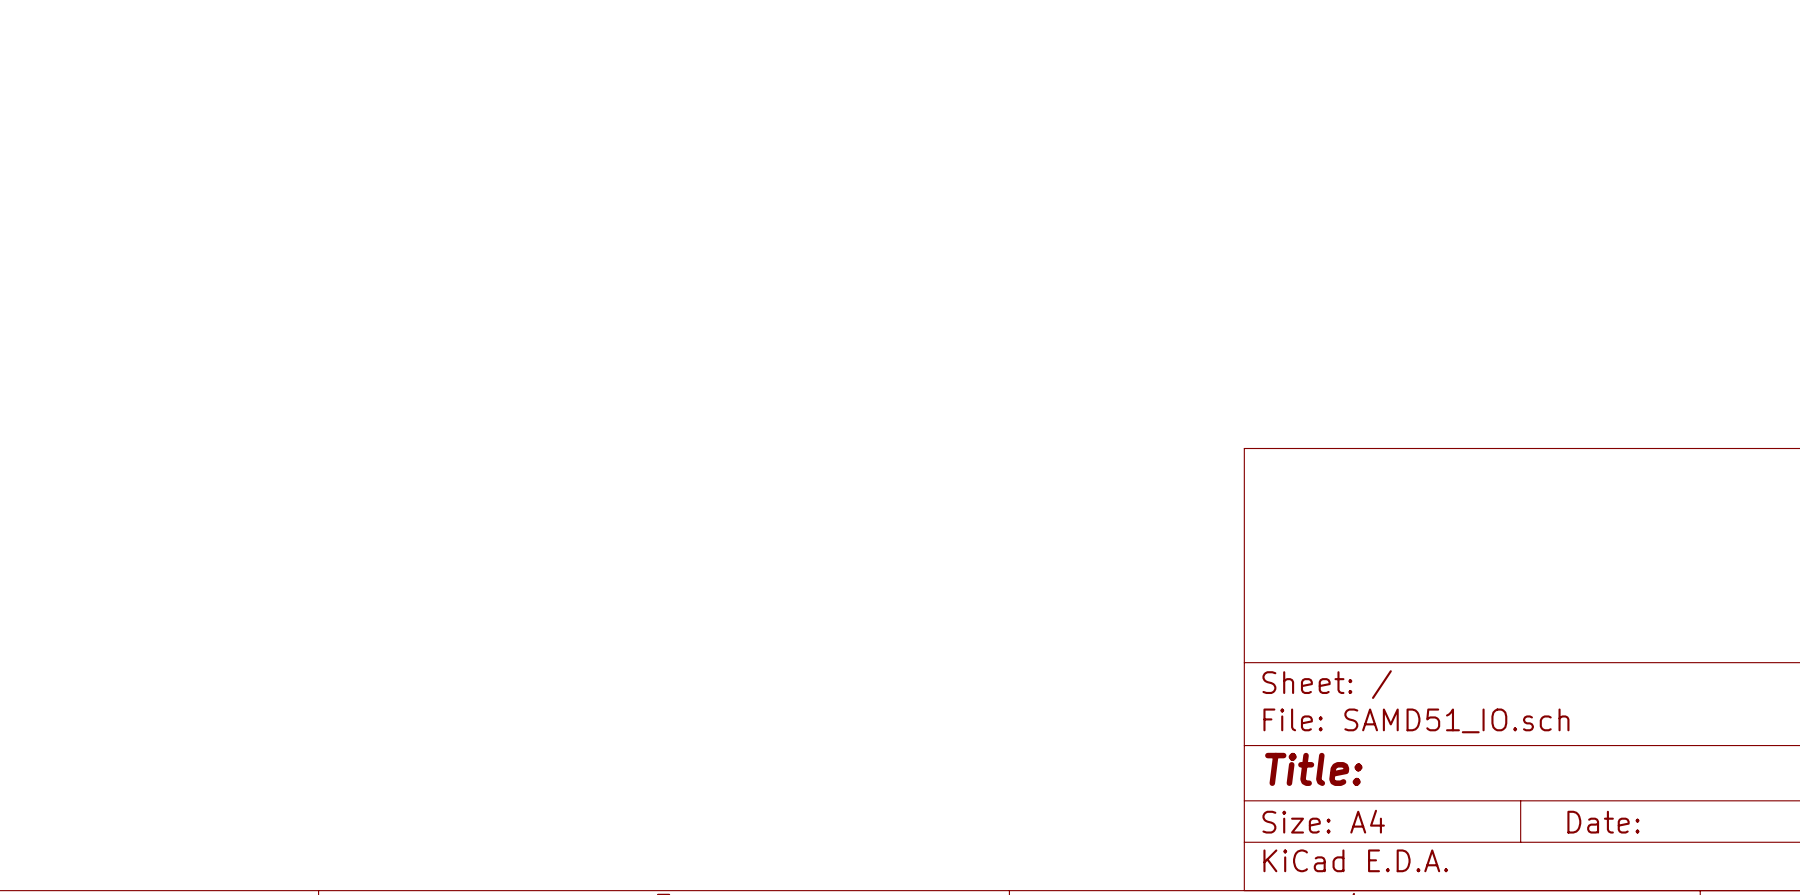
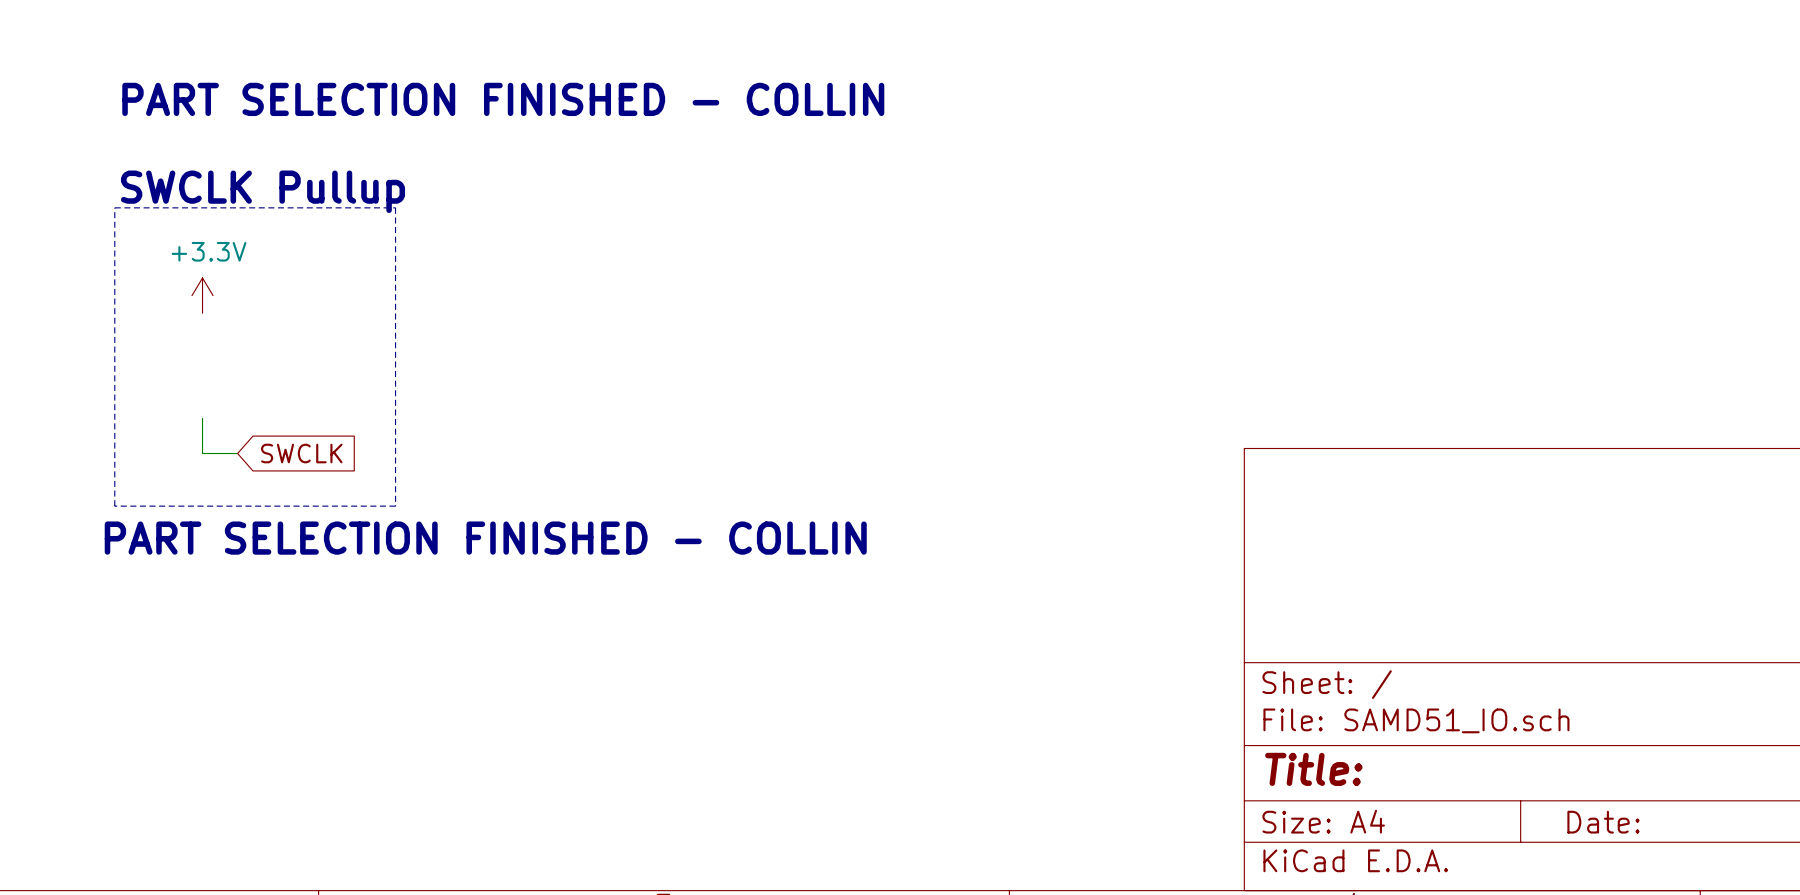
text: none -> PART SELECTION FINISHED - COLLIN (503, 99)
text: none -> SWCLK Pullup (263, 191)
line: none -> (114, 207) (395, 207) (395, 506) (114, 506) (114, 207)
power symbol: none -> +3.3V (202, 295)
wire: none -> (202, 418) (202, 453) (237, 453)
global label: none -> SWCLK (301, 453)
text: none -> PART SELECTION FINISHED - COLLIN (485, 538)

